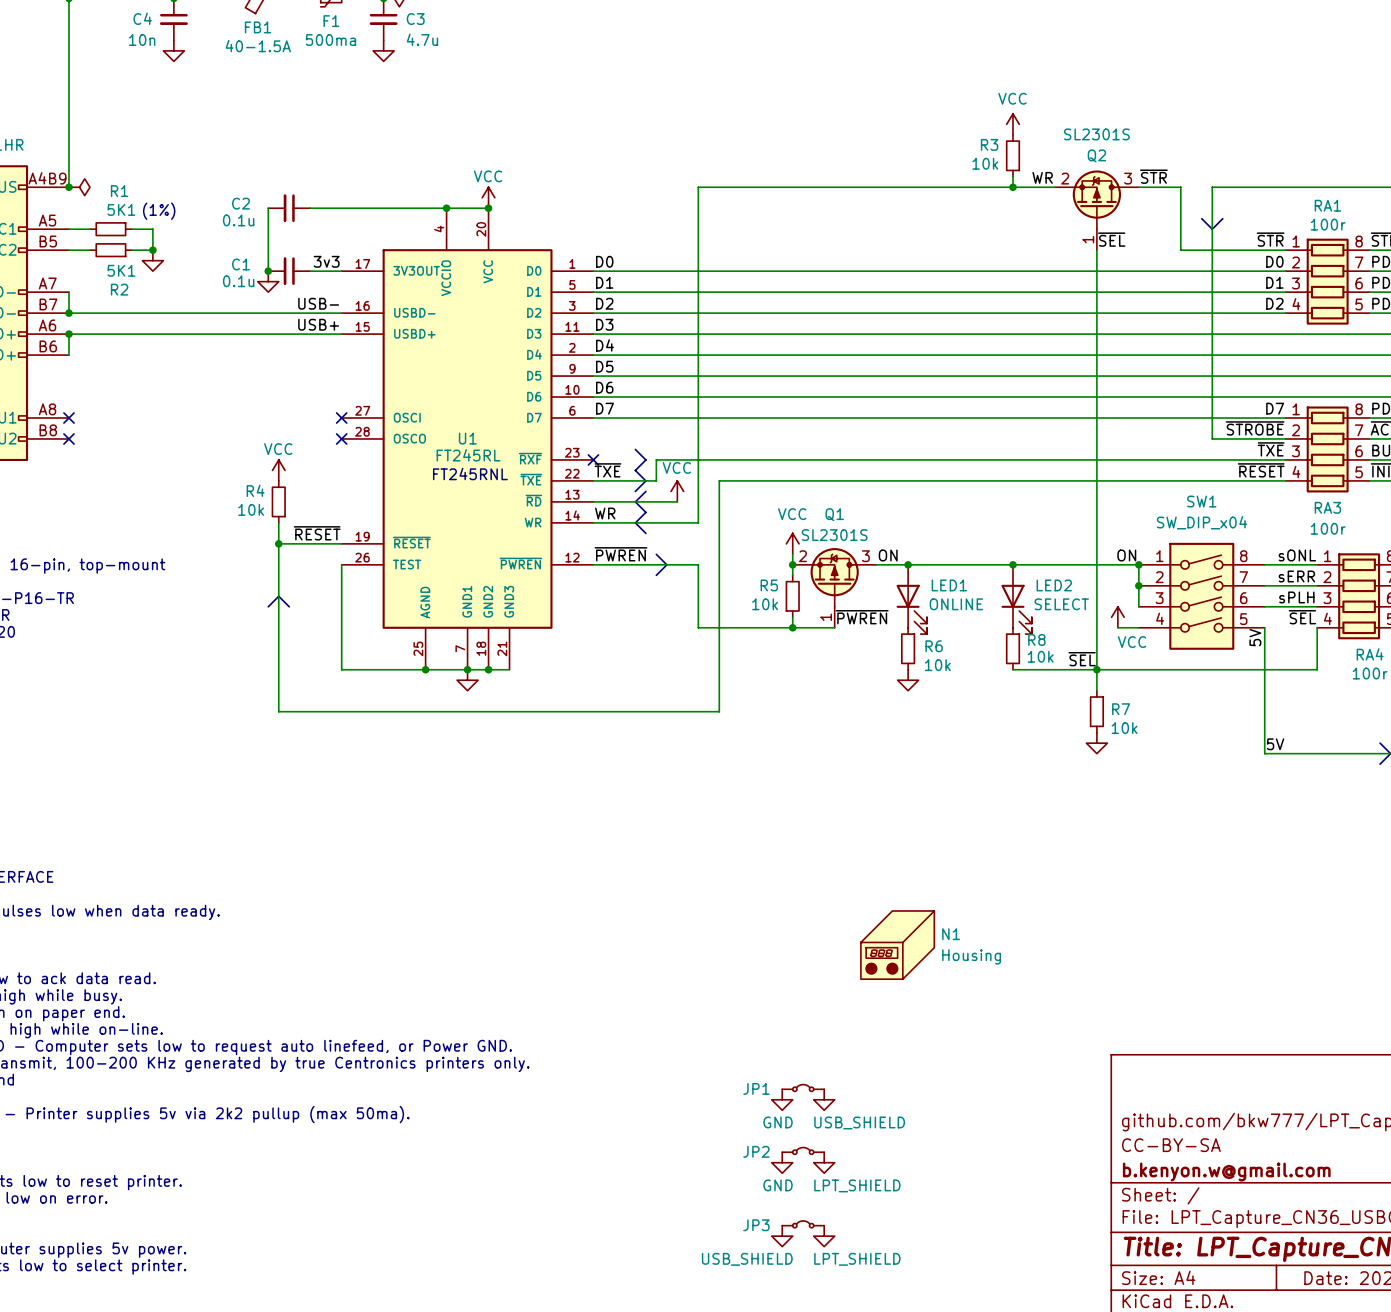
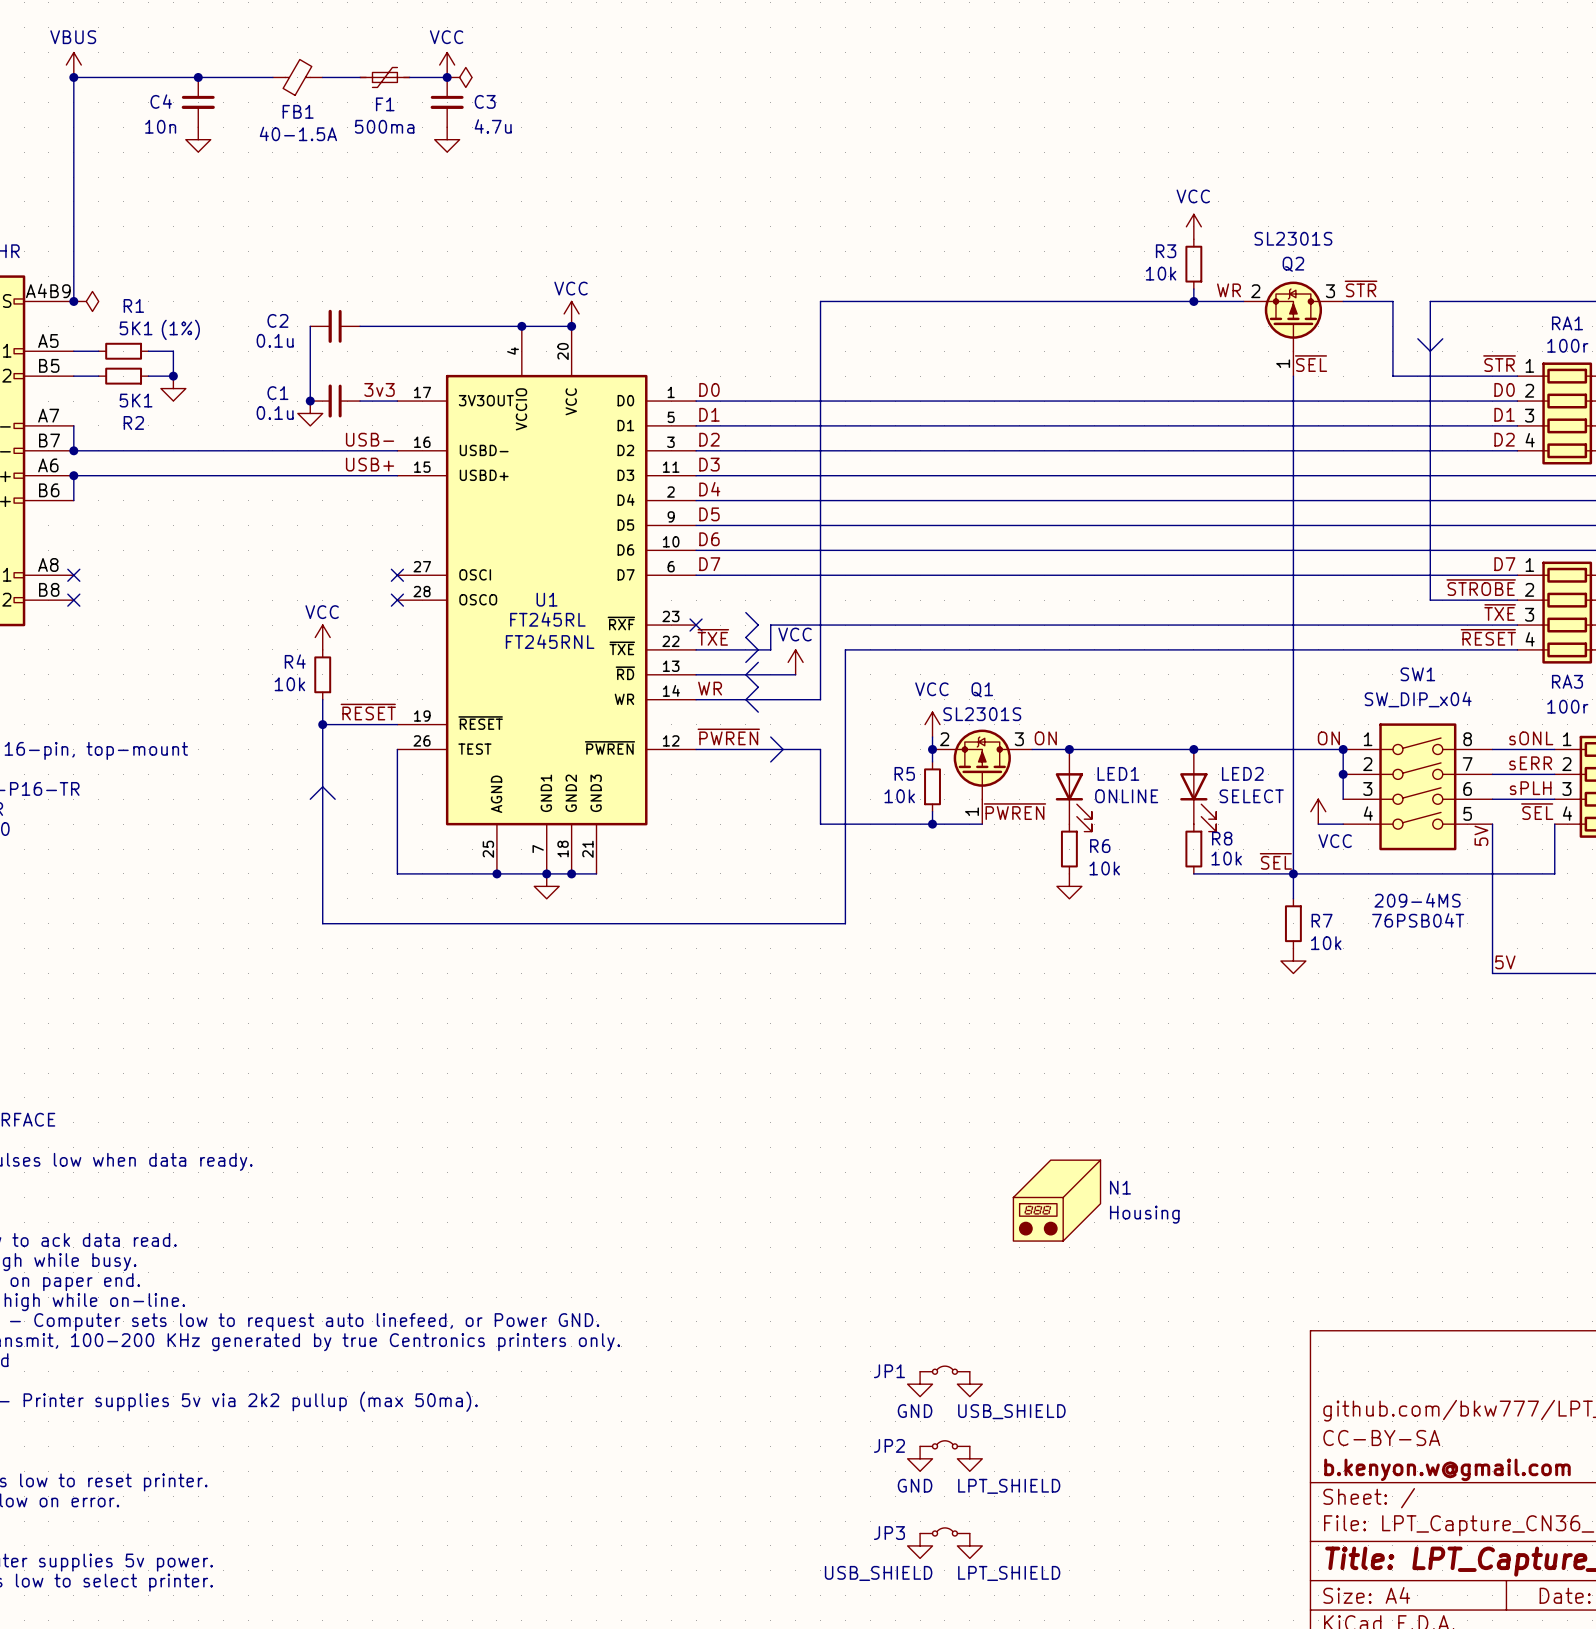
text: none -> 209-4MS (1417, 900)
text: none -> 76PSB04T (1418, 920)

